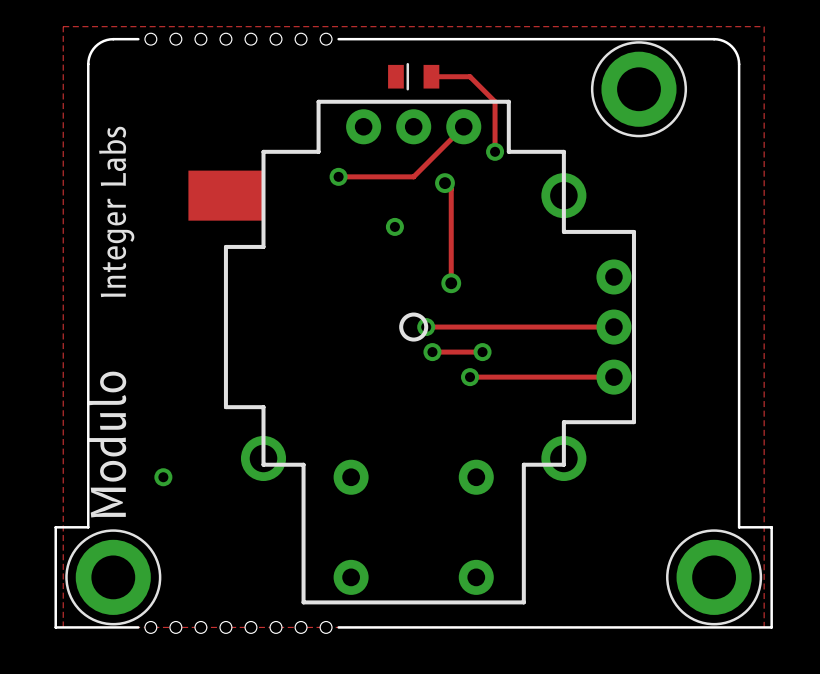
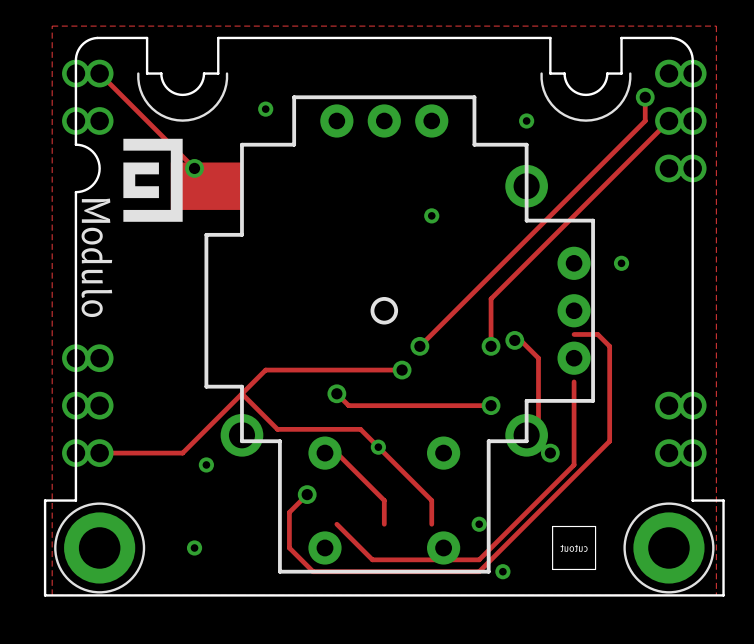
part footprint: [54, 33, 773, 634] -> [43, 36, 725, 597]
track: none -> (99, 73) (194, 168)
part: (413, 76) -> none
track: (431, 76) (470, 76) (495, 101) (495, 151) -> none
track: none -> (645, 97) (645, 120) (419, 346)
via: none -> (645, 97)
via: none -> (265, 109)
track: (463, 126) (413, 176) (338, 176) -> none
via: none -> (526, 120)
track: none -> (668, 120) (491, 298) (491, 346)
drawing: none -> [123, 138, 183, 222]
via: (495, 151) -> none
via: none -> (194, 168)
via: (338, 176) -> none
track: (444, 183) (451, 189) (451, 283) -> none
via: (444, 183) -> none
via: (394, 226) -> none
via: none -> (431, 215)
via: none -> (621, 263)
via: (451, 283) -> none
track: (426, 327) (613, 327) -> none
via: (426, 327) -> none
track: (432, 352) (482, 352) -> none
via: (432, 352) -> none
via: (482, 352) -> none
track: none -> (574, 334) (597, 334) (609, 346) (609, 441) (479, 571) (313, 571) (289, 547) (289, 512) (307, 494)
track: none -> (514, 340) (520, 340) (538, 358) (538, 441) (550, 453)
via: none -> (514, 340)
via: none -> (419, 346)
via: none -> (491, 346)
track: (470, 377) (613, 377) -> none
via: (470, 377) -> none
track: none -> (402, 370) (265, 370) (182, 453) (99, 453)
via: none -> (402, 370)
track: none -> (574, 381) (574, 464) (479, 559) (372, 559) (336, 524)
track: none -> (241, 393) (277, 429) (360, 429) (431, 500) (431, 524)
track: none -> (336, 393) (348, 405) (491, 405)
via: none -> (336, 393)
via: none -> (491, 405)
via: none -> (378, 447)
via: (163, 477) -> none
track: none -> (336, 453) (384, 500) (384, 524)
via: none -> (550, 453)
via: none -> (206, 464)
via: none -> (307, 494)
via: none -> (479, 524)
via: none -> (194, 547)
part: none -> (574, 547)
via: none -> (502, 571)

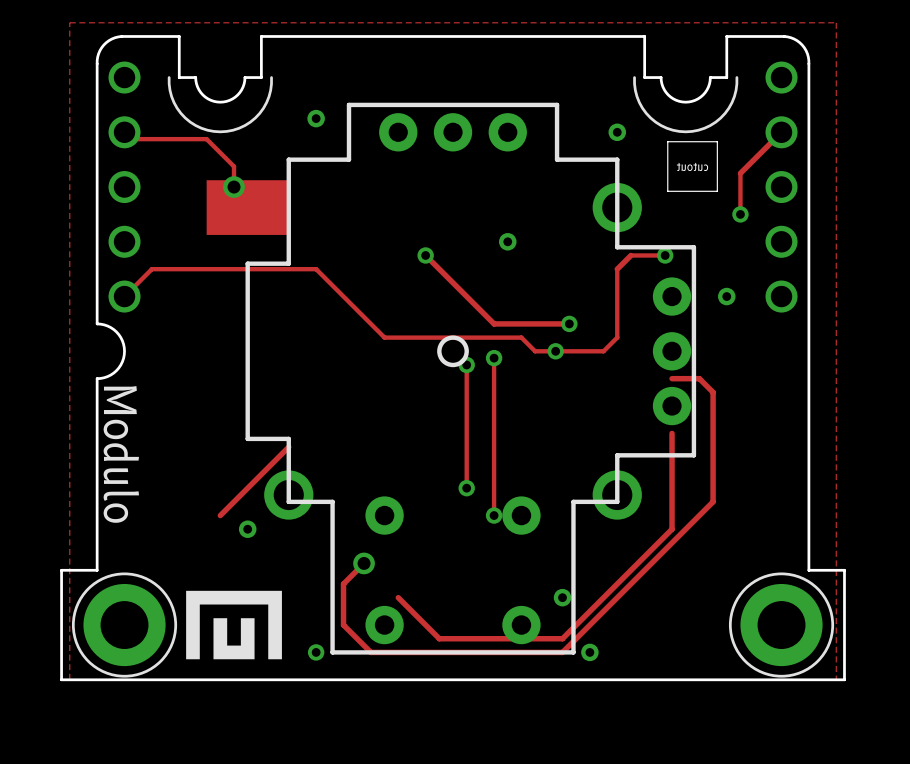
part footprint: [43, 36, 725, 597] -> [60, 35, 846, 682]
track: (99, 73) (194, 168) -> (124, 132) (131, 139) (206, 139) (234, 166) (234, 187)
track: (645, 97) (645, 120) (538, 227) -> (665, 255) (630, 255)
via: (645, 97) -> none
drawing: [123, 138, 183, 222] -> none
track: (633, 156) (491, 298) (491, 346) -> (740, 173) (740, 214)
via: none -> (740, 214)
track: none -> (425, 255) (494, 323) (569, 323)
via: none -> (425, 255)
via: none -> (665, 255)
track: (526, 239) (419, 346) -> (617, 269) (617, 337) (603, 351) (535, 351) (521, 337) (384, 337) (316, 269) (151, 269) (124, 296)
via: none -> (569, 323)
via: none -> (555, 351)
track: none -> (494, 358) (494, 515)
via: none -> (494, 358)
track: none -> (466, 364) (466, 488)
via: none -> (466, 364)
track: (514, 340) (520, 340) (538, 358) (538, 441) (550, 453) -> none
via: (514, 340) -> none
via: (419, 346) -> none
via: (491, 346) -> none
track: (402, 370) (265, 370) (241, 393) (277, 429) (360, 429) (431, 500) (431, 524) -> none
via: (402, 370) -> none
track: (336, 393) (348, 405) (491, 405) -> none
via: (336, 393) -> none
via: (491, 405) -> none
via: none -> (466, 488)
via: (378, 447) -> none
track: (99, 453) (182, 453) -> none
track: (336, 453) (384, 500) (384, 524) -> none
via: none -> (494, 515)
via: (550, 453) -> none
drawing: none -> [186, 590, 282, 660]
via: (194, 547) -> none
part position: (574, 547) -> (692, 166)
via: none -> (316, 652)

